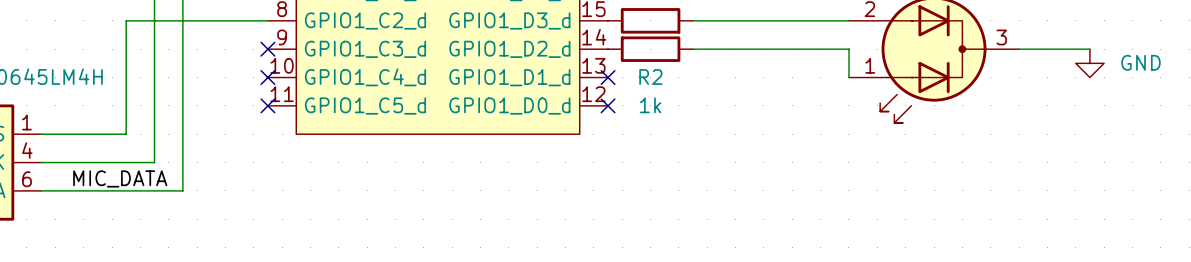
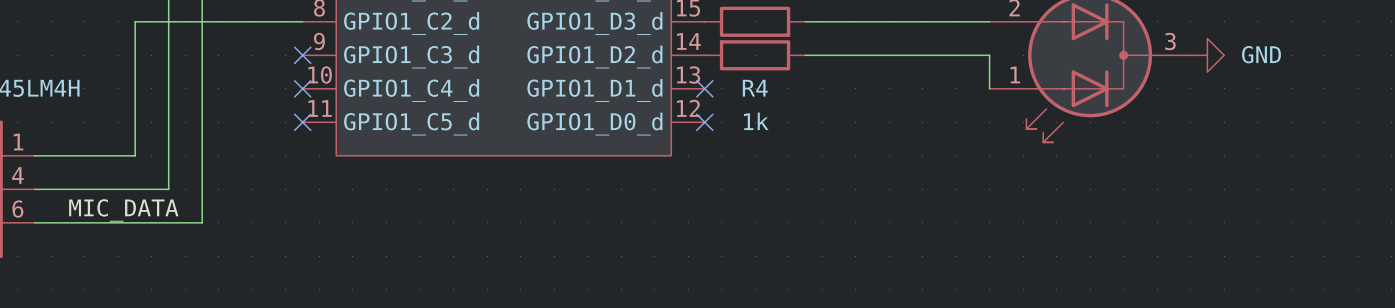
wire: (1019, 49) (1089, 49) -> none
power symbol rotation: 0° (1089, 63) -> 90° counterclockwise (1207, 55)
power symbol position: GND (1089, 63) -> GND (1207, 55)
R2 name: R2 (650, 77) -> R4 (755, 88)

